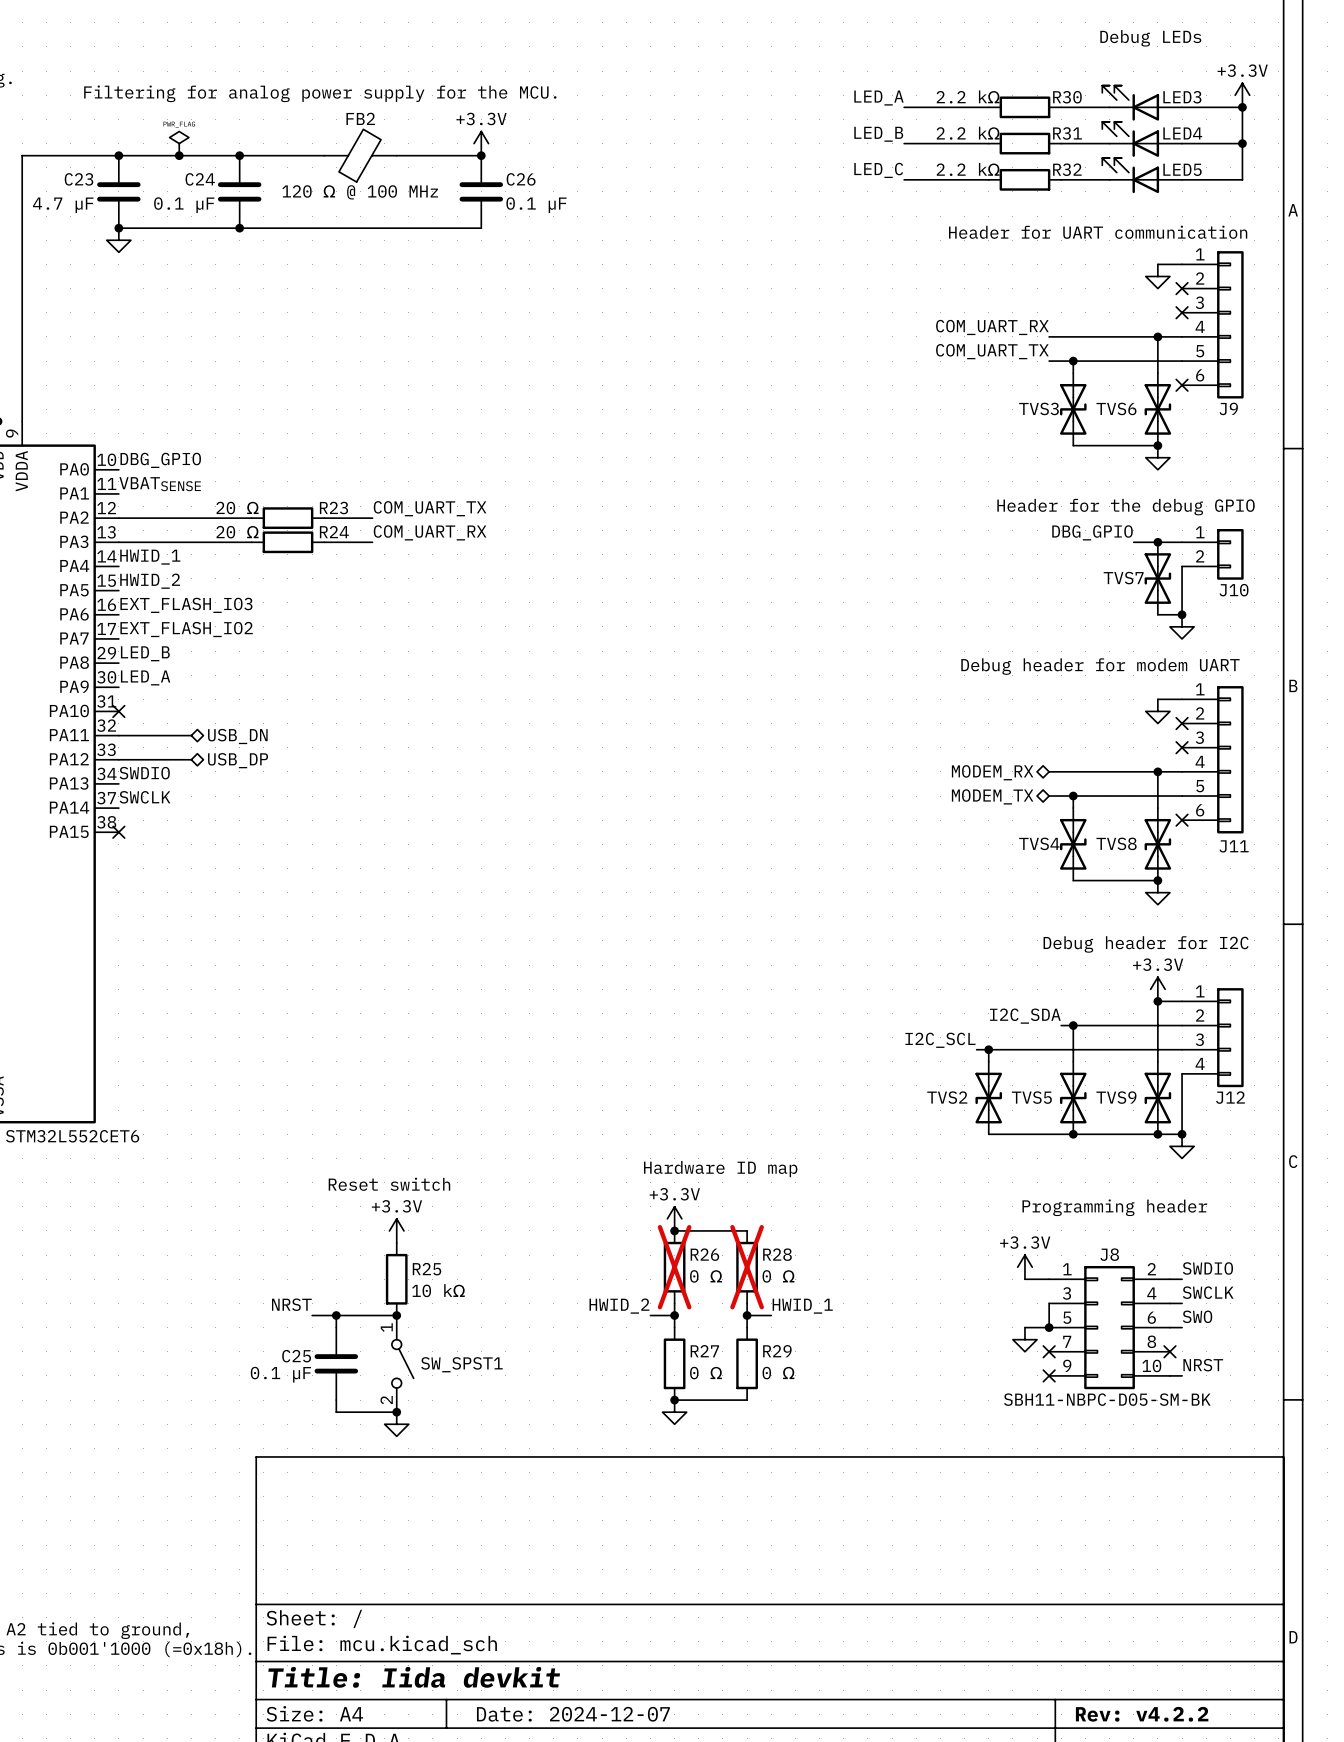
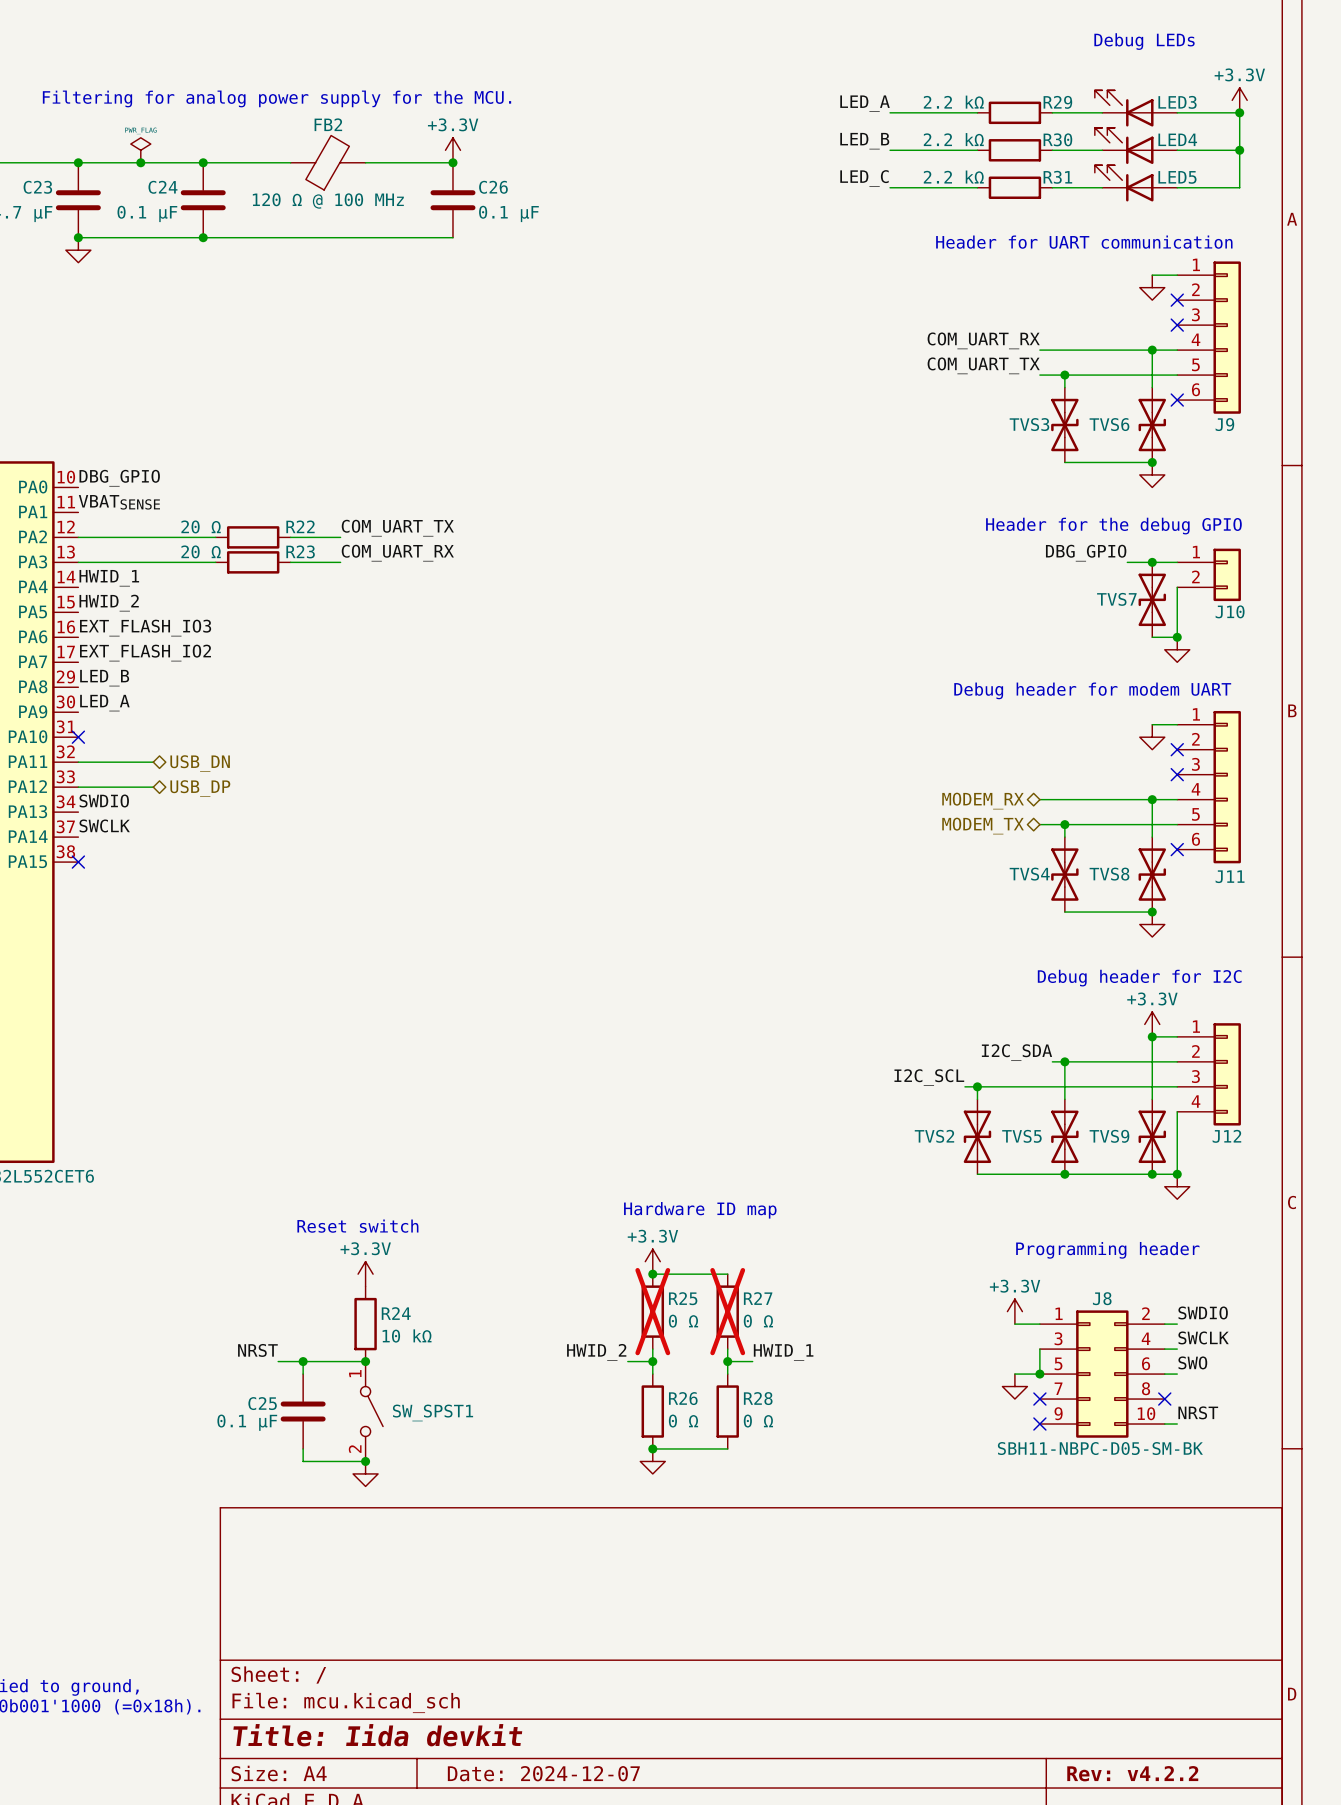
R30 name: R30 (1067, 97) -> R29 (1057, 102)
R31 name: R31 (1067, 133) -> R30 (1057, 139)
R32 name: R32 (1067, 169) -> R31 (1057, 177)
R23 name: R23 (333, 508) -> R22 (300, 526)
R24 name: R24 (334, 532) -> R23 (300, 551)
R26 name: R26 (704, 1254) -> R25 (683, 1298)
R28 name: R28 (777, 1254) -> R27 (758, 1298)
R25 name: R25 (427, 1269) -> R24 (396, 1313)
R27 name: R27 (704, 1351) -> R26 (683, 1398)
R29 name: R29 (777, 1351) -> R28 (758, 1398)

